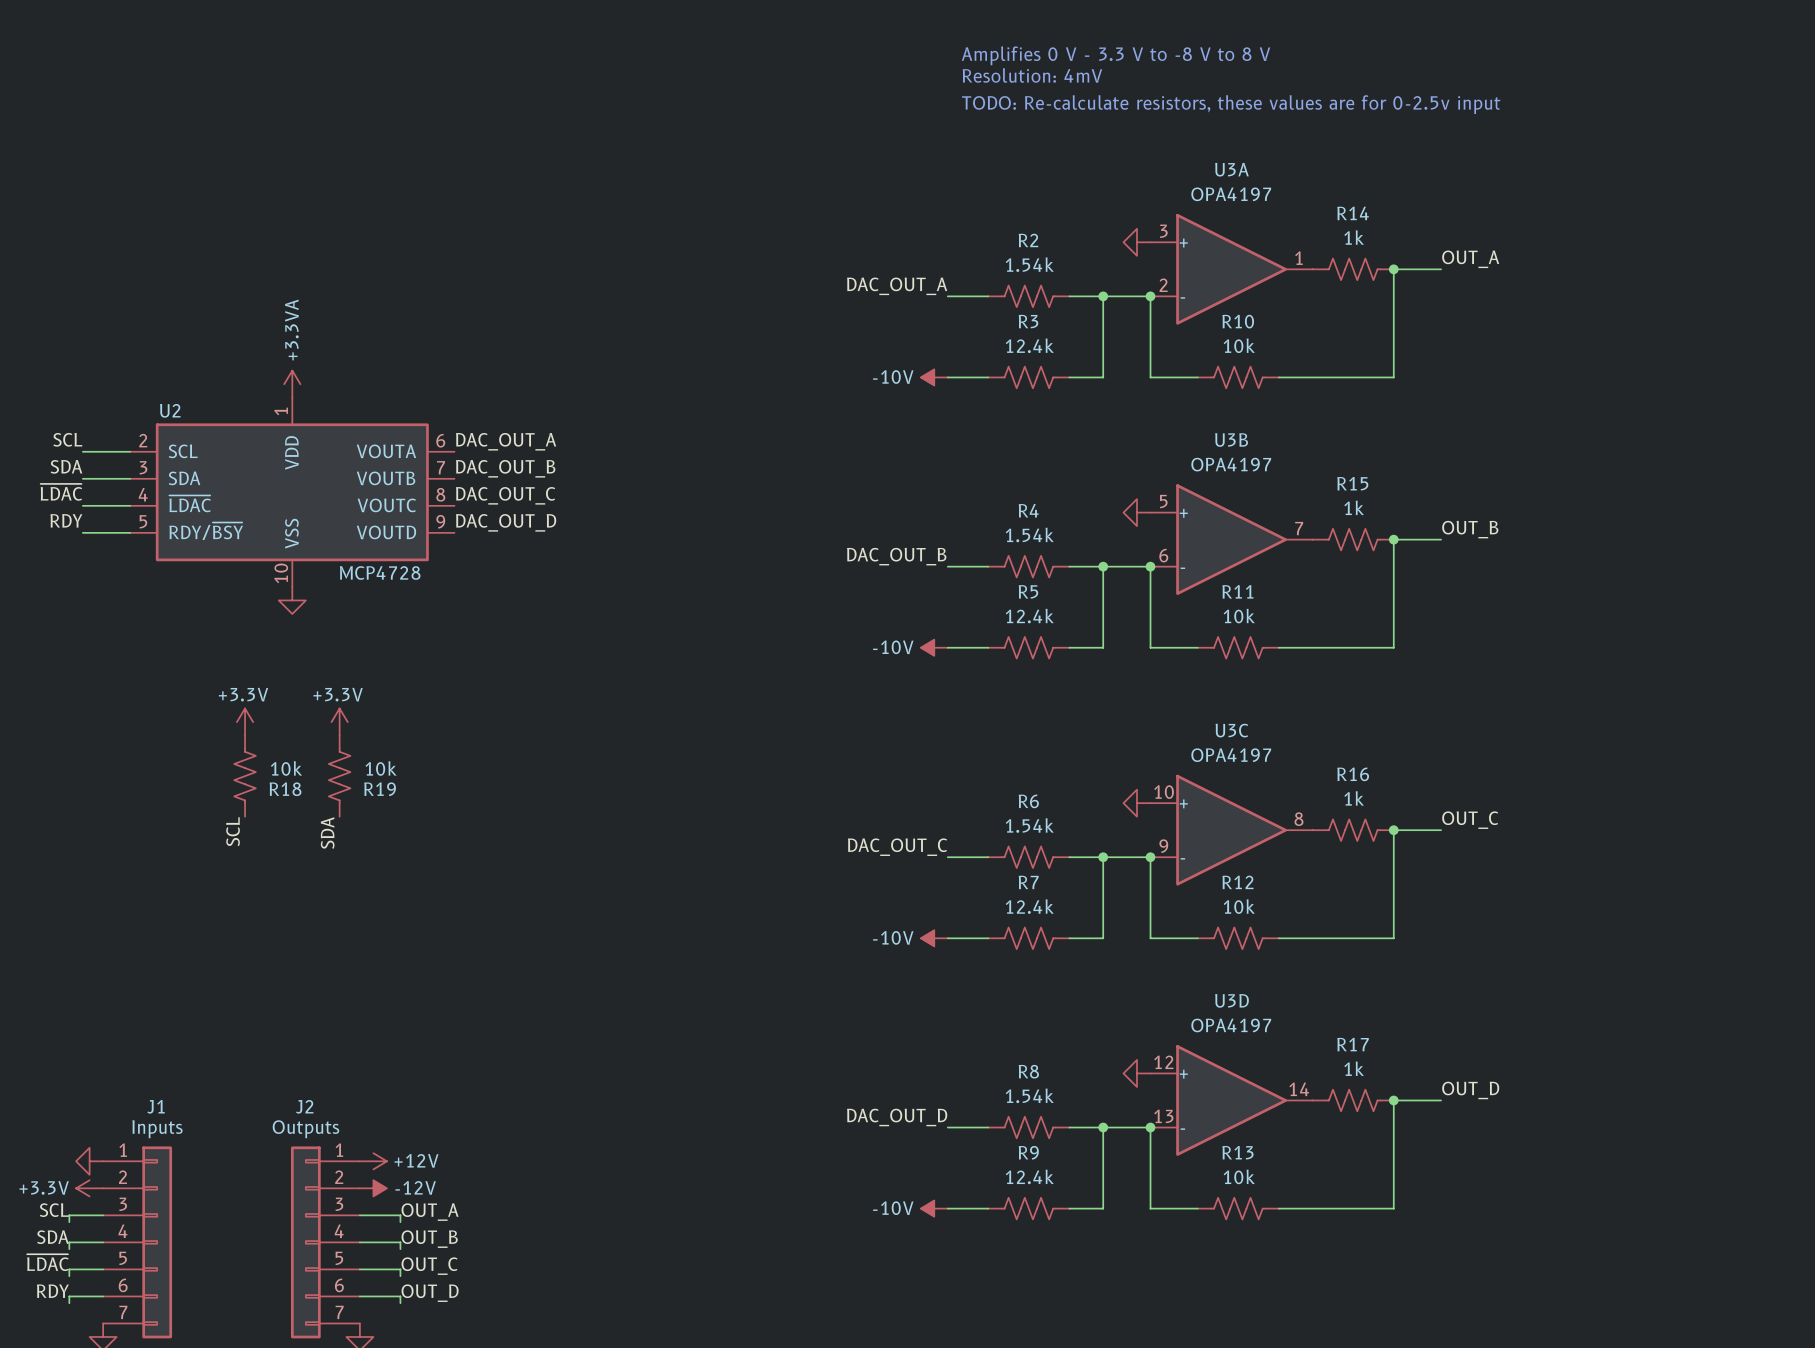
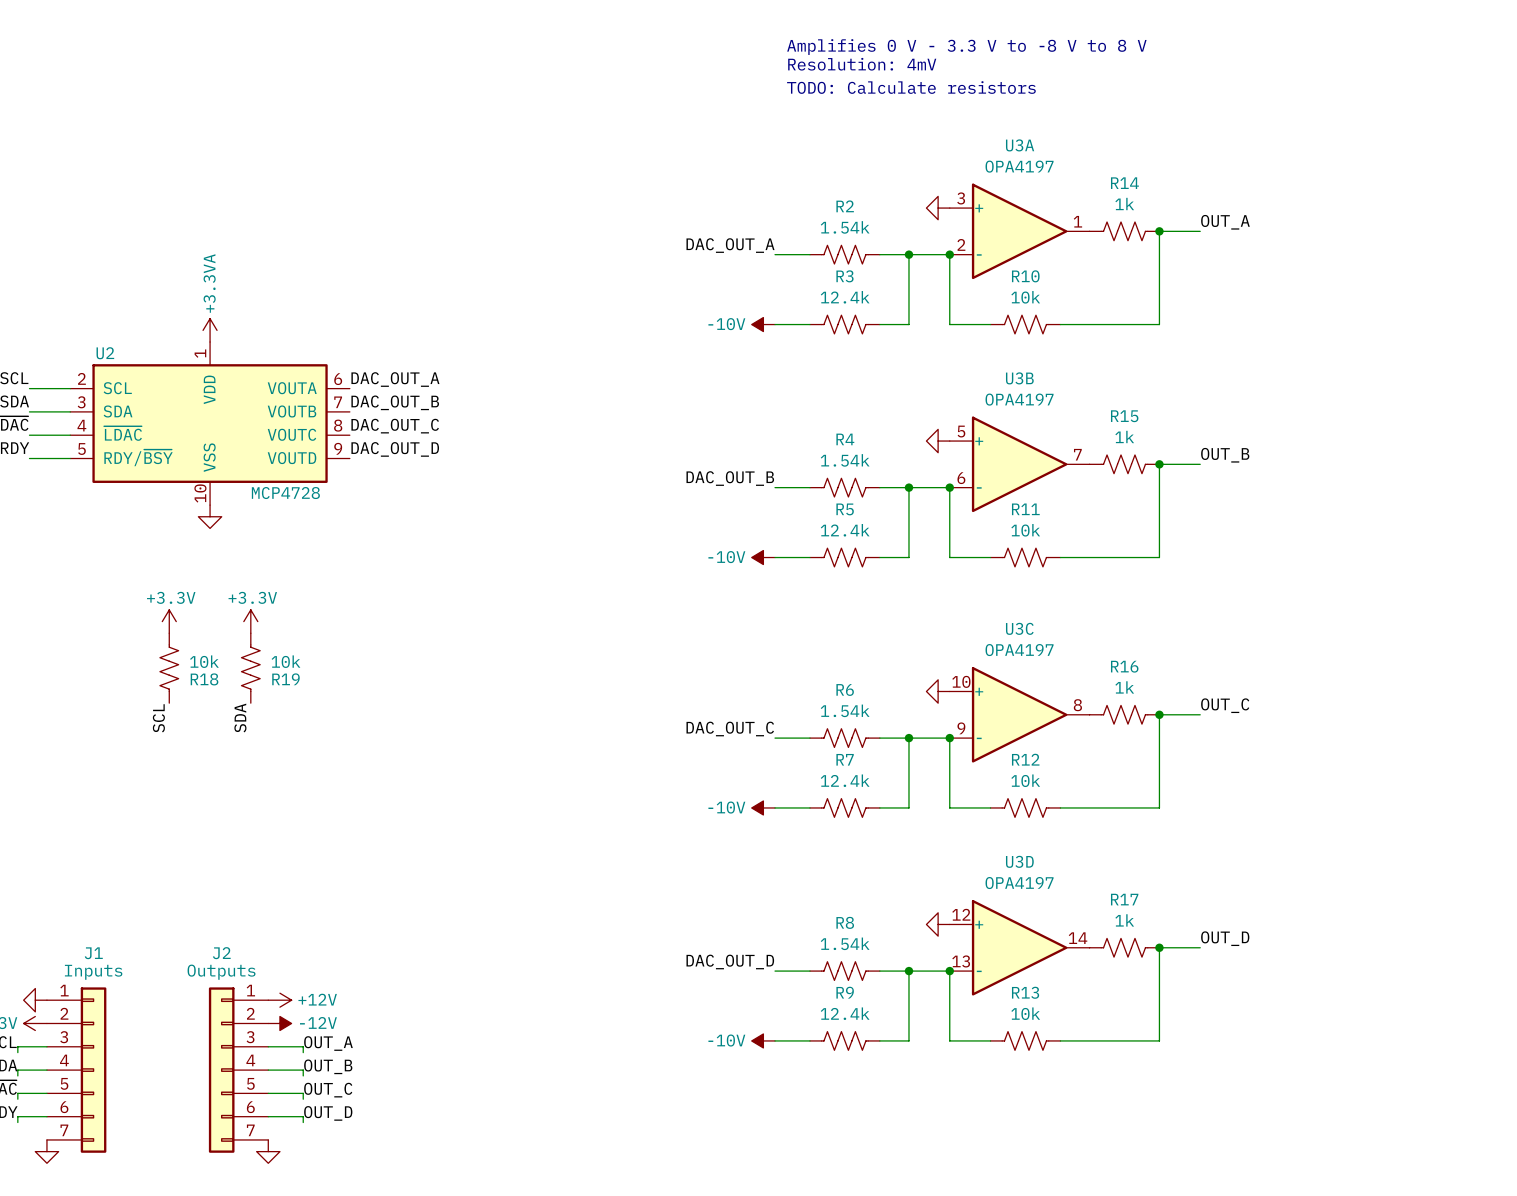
text: TODO: Re-calculate resistors, these values are for 0-2.5v input (1231, 104) -> TODO: Calculate resistors (911, 87)

